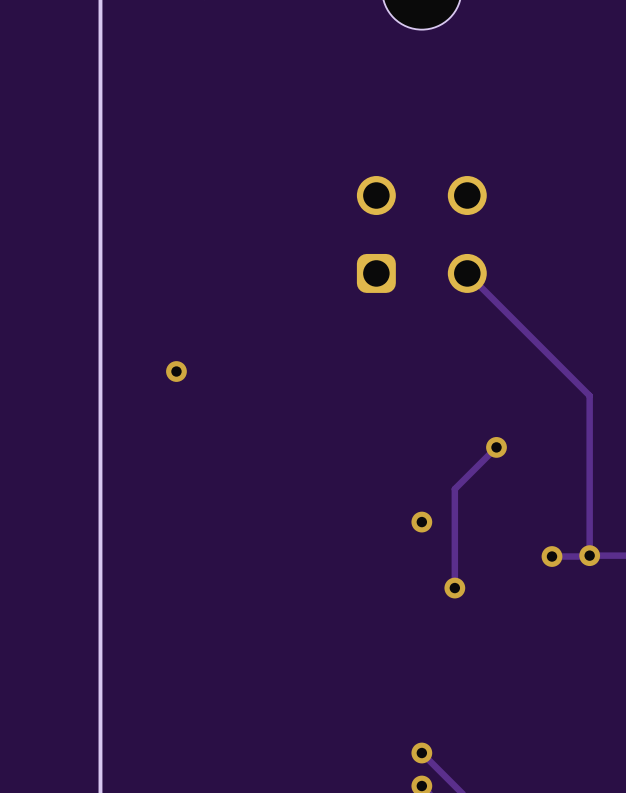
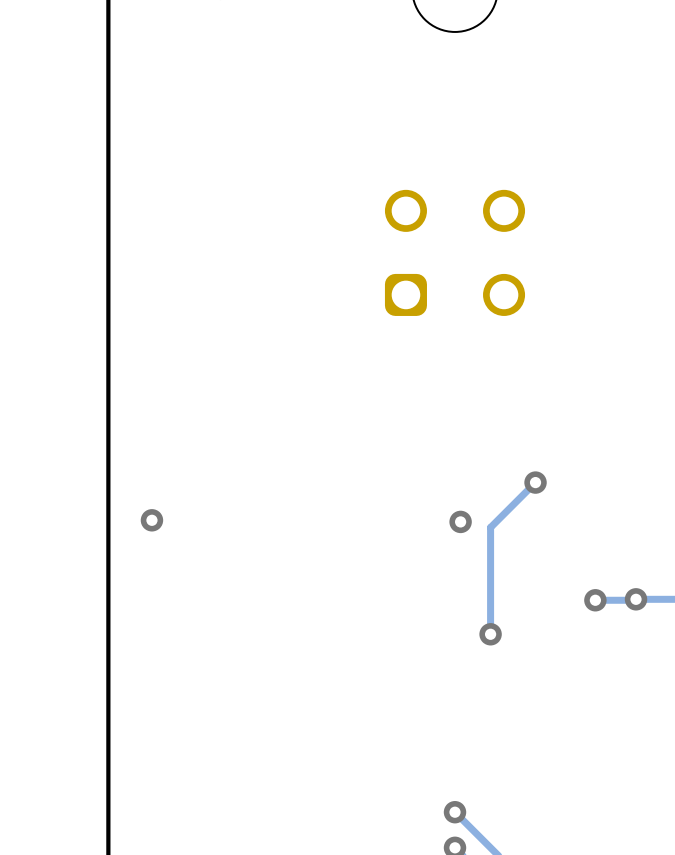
track: (467, 273) (589, 395) (589, 555) -> none
via position: (176, 371) -> (151, 520)
via position: (421, 522) -> (460, 521)

